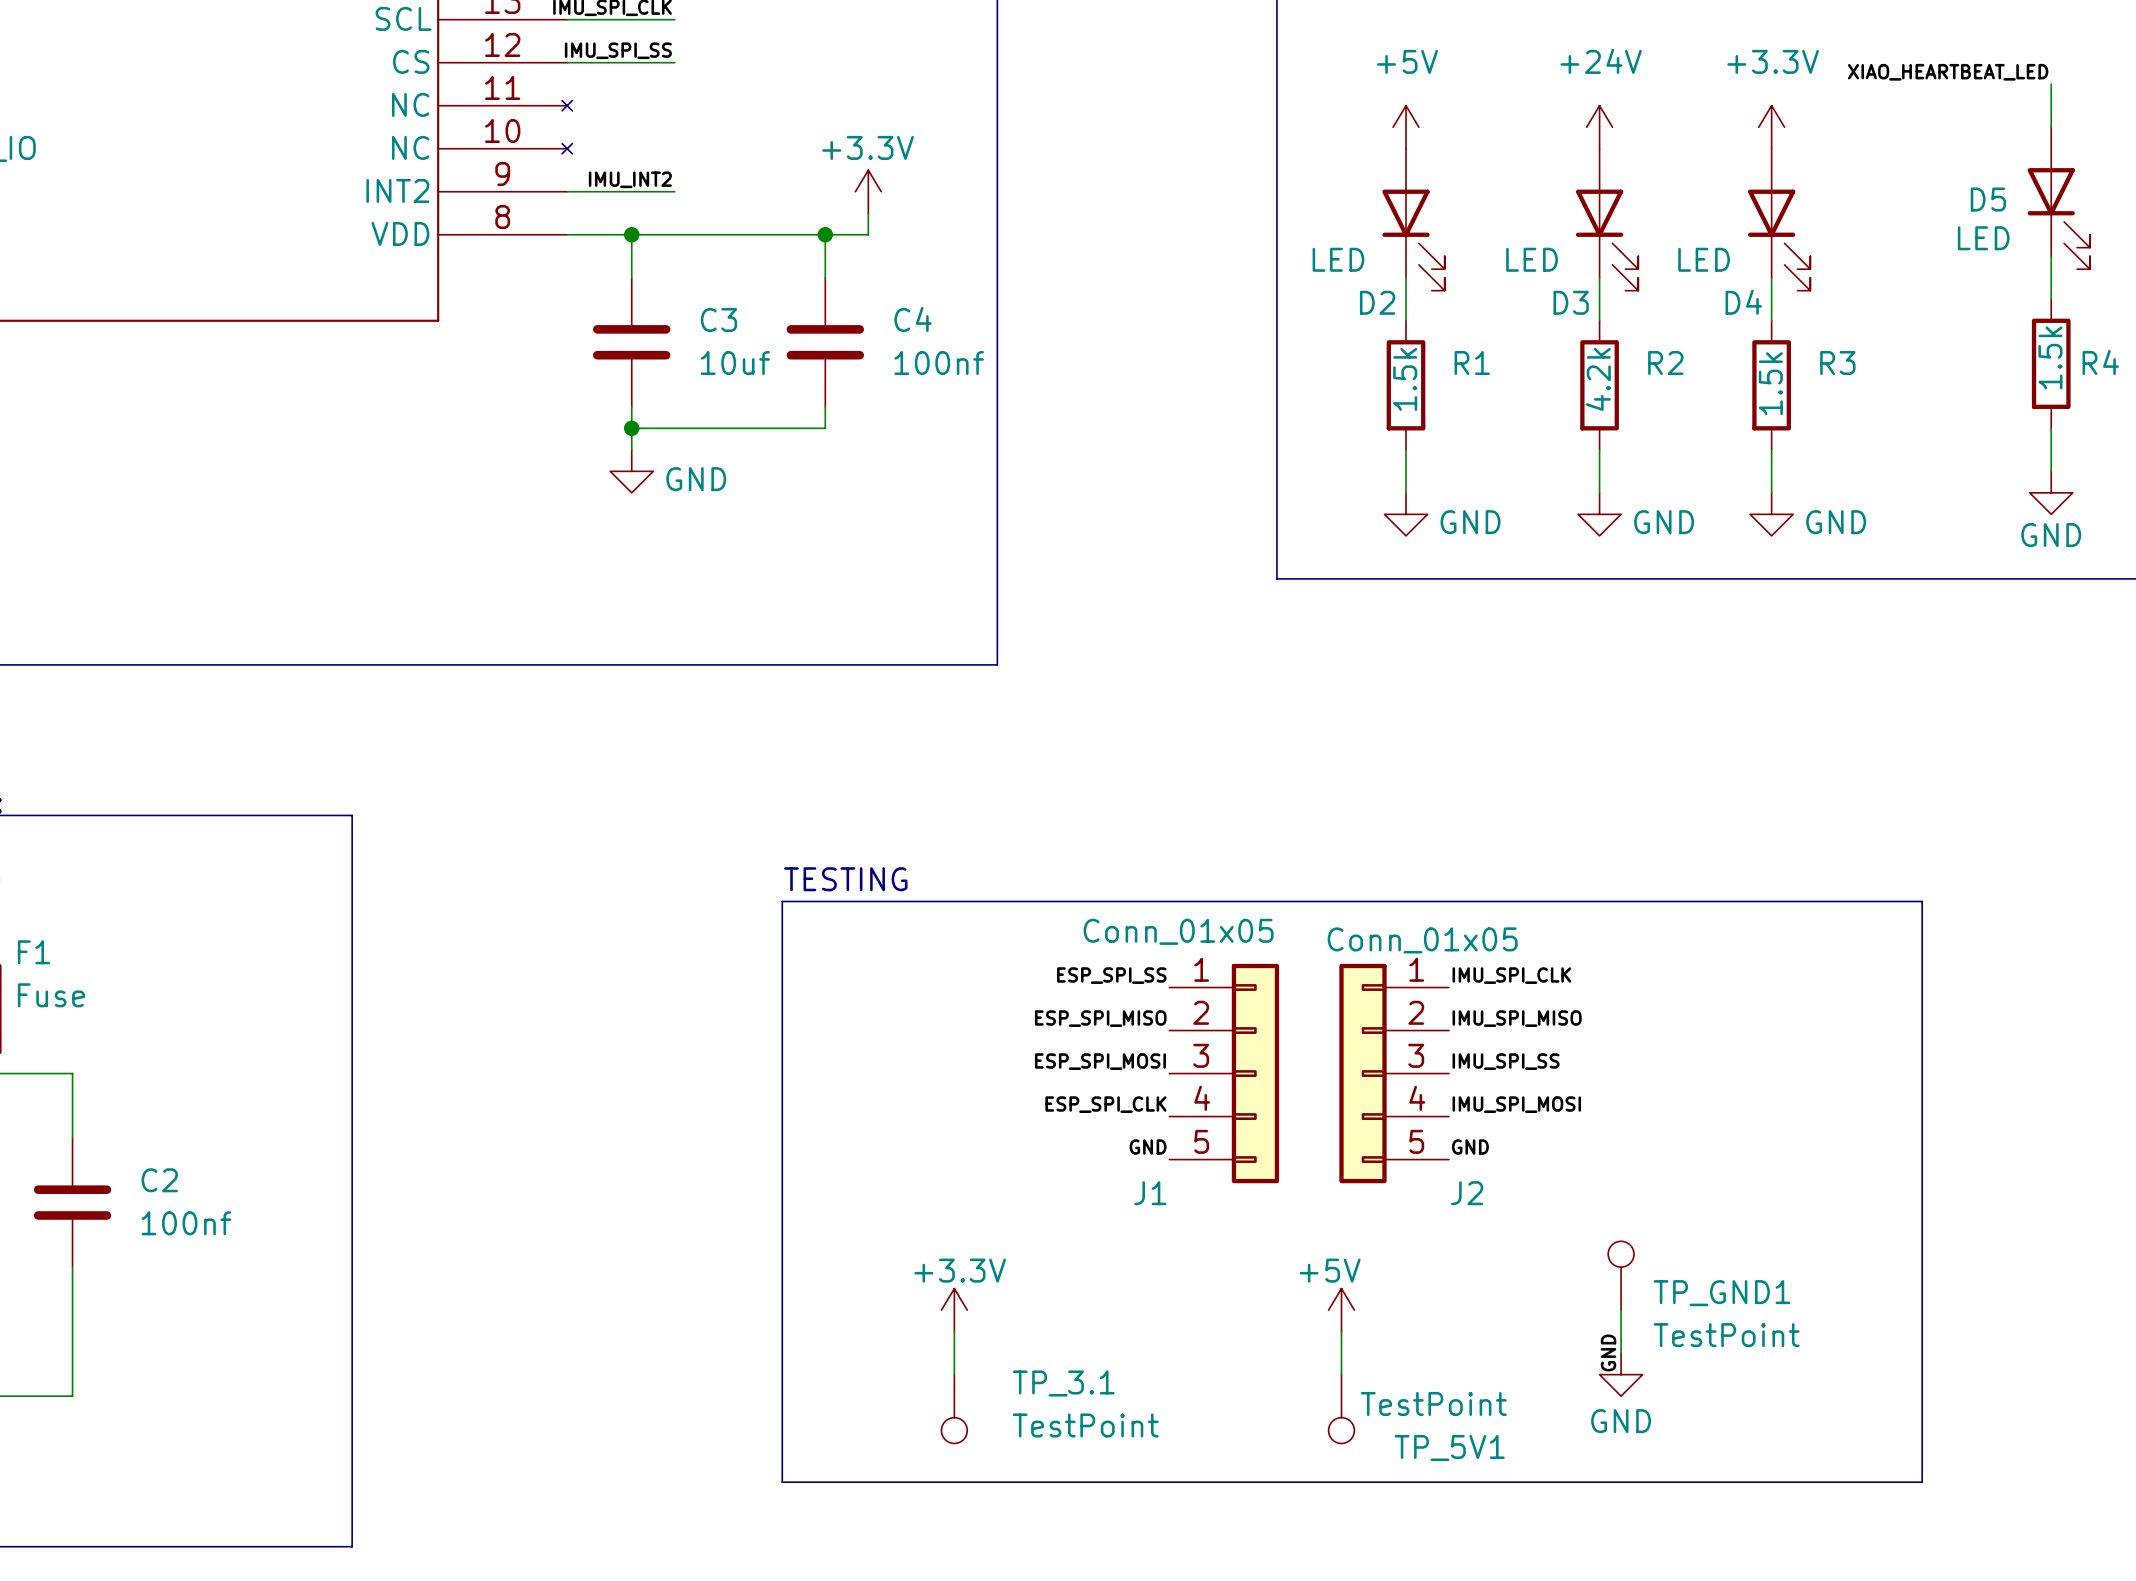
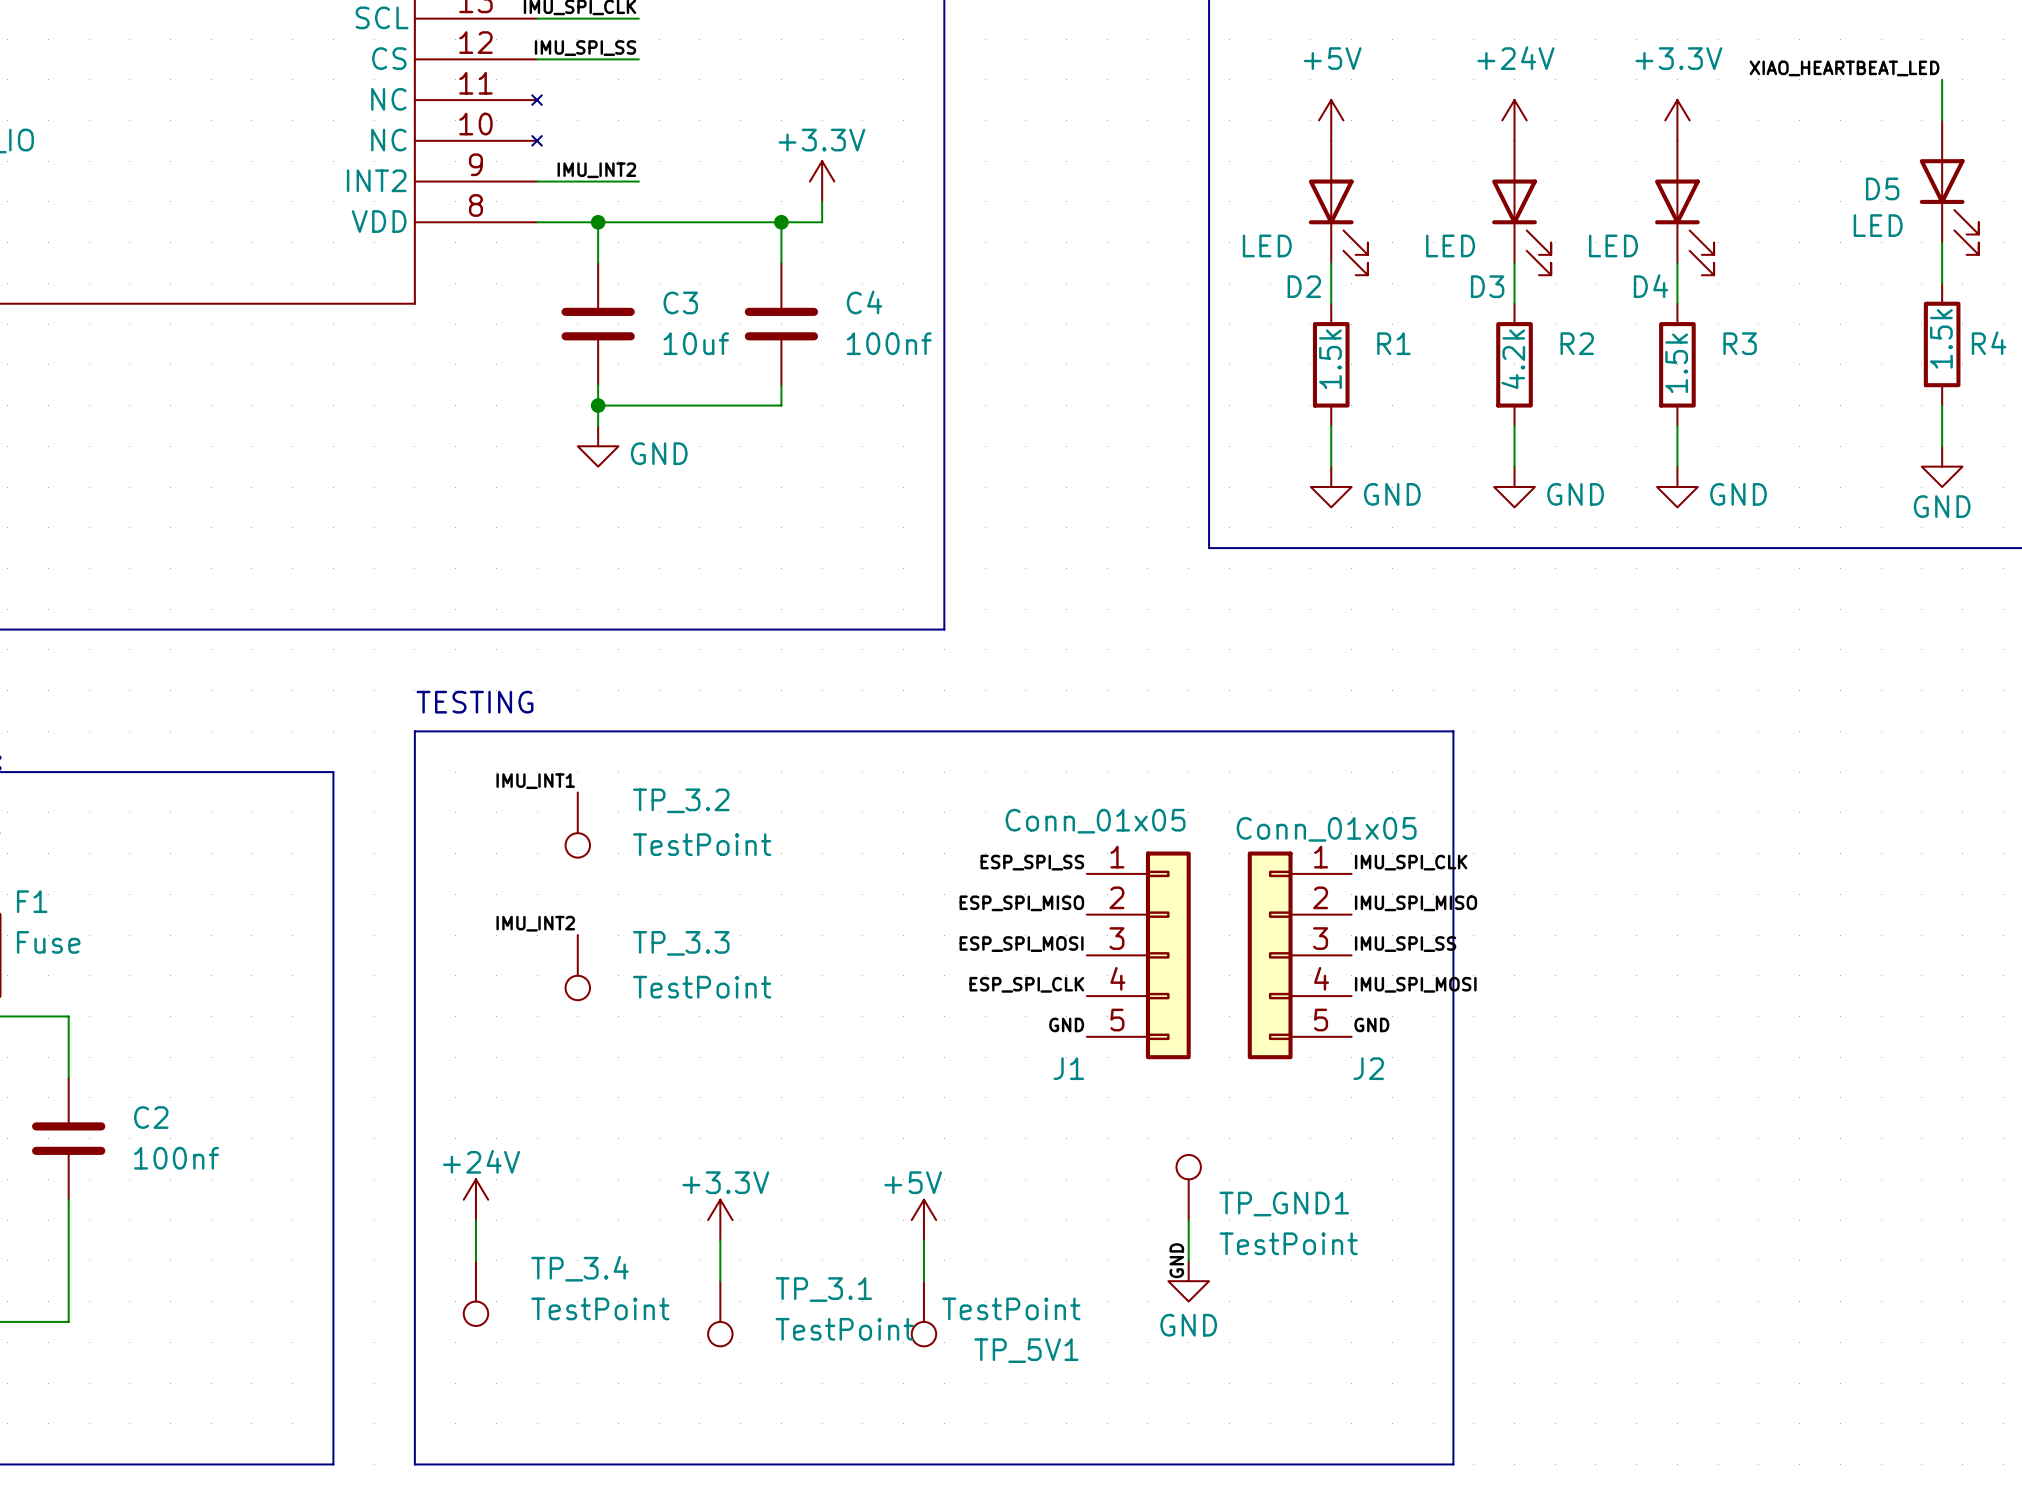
line: none -> (414, 731) (1453, 731) (1453, 1464) (414, 1464) (414, 731)
label: none -> IMU_INT1 (535, 781)
TP_3.2: none -> TestPoint (577, 825)
text position: TESTING (845, 879) -> TESTING (474, 702)
line: (782, 901) (1922, 901) (1922, 1482) (782, 1482) (782, 901) -> none
label: none -> IMU_INT2 (535, 923)
label position: ESP_SPI_SS (1111, 975) -> ESP_SPI_SS (1032, 862)
label position: IMU_SPI_CLK (1511, 975) -> IMU_SPI_CLK (1411, 862)
label position: ESP_SPI_MISO (1100, 1018) -> ESP_SPI_MISO (1021, 903)
label position: IMU_SPI_MISO (1517, 1018) -> IMU_SPI_MISO (1416, 903)
TP_3.3: none -> TestPoint (577, 967)
label position: ESP_SPI_MOSI (1100, 1061) -> ESP_SPI_MOSI (1021, 944)
label position: IMU_SPI_SS (1506, 1061) -> IMU_SPI_SS (1405, 944)
J1 position: (1224, 1073) -> (1138, 955)
J2 position: (1394, 1073) -> (1299, 955)
label position: ESP_SPI_CLK (1105, 1104) -> ESP_SPI_CLK (1026, 984)
label position: IMU_SPI_MOSI (1516, 1104) -> IMU_SPI_MOSI (1415, 984)
label position: GND (1148, 1147) -> GND (1066, 1024)
label position: GND (1470, 1147) -> GND (1371, 1024)
power symbol: none -> +24V (475, 1199)
TP_GND1 position: (1621, 1275) -> (1188, 1187)
wire: none -> (475, 1220) (475, 1260)
power symbol position: +3.3V (954, 1310) -> +3.3V (720, 1220)
power symbol position: +5V (1341, 1310) -> +5V (923, 1220)
wire: (1621, 1310) (1621, 1353) -> (1188, 1220) (1188, 1260)
wire: (954, 1331) (954, 1374) -> (720, 1240) (720, 1281)
label: none -> GND (1176, 1260)
wire: (1341, 1331) (1341, 1374) -> (923, 1240) (923, 1281)
label: GND (1608, 1353) -> none
TP_3.4: none -> TestPoint (475, 1293)
power symbol position: GND (1621, 1374) -> GND (1188, 1281)
TP_3.1 position: (954, 1409) -> (720, 1313)
TP_5V1 position: (1341, 1409) -> (923, 1313)

